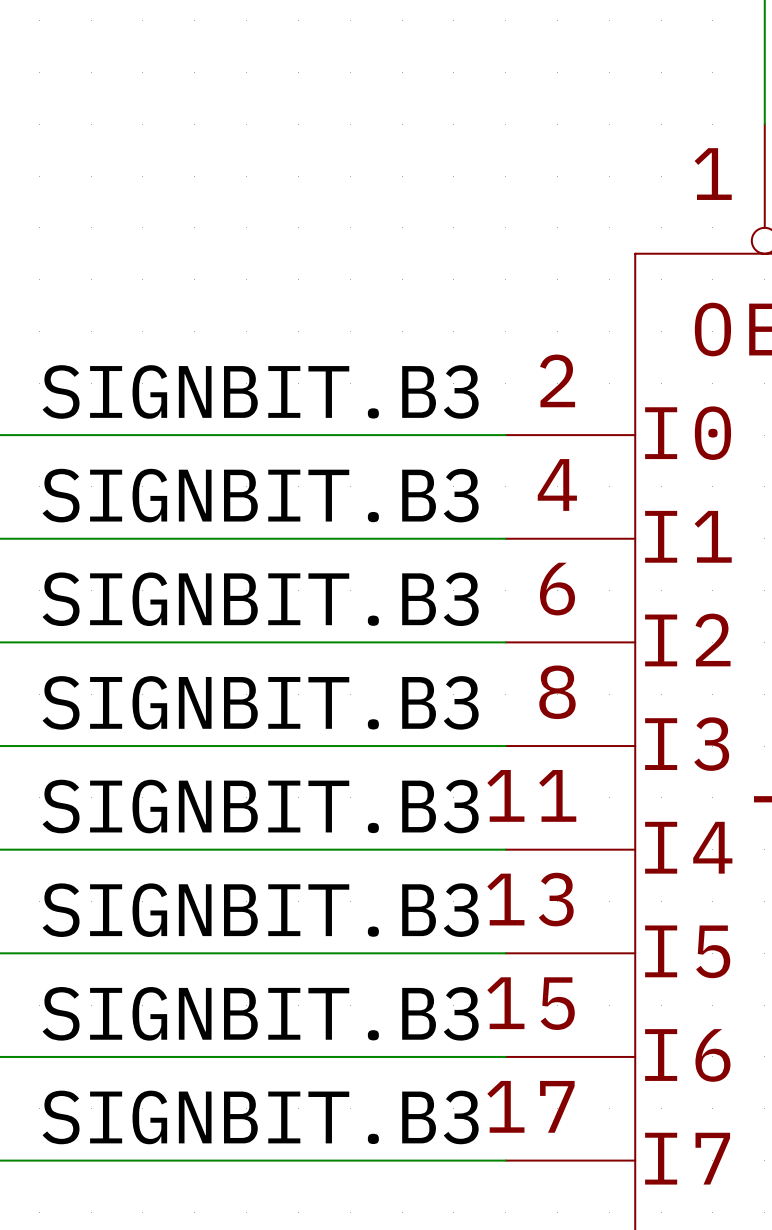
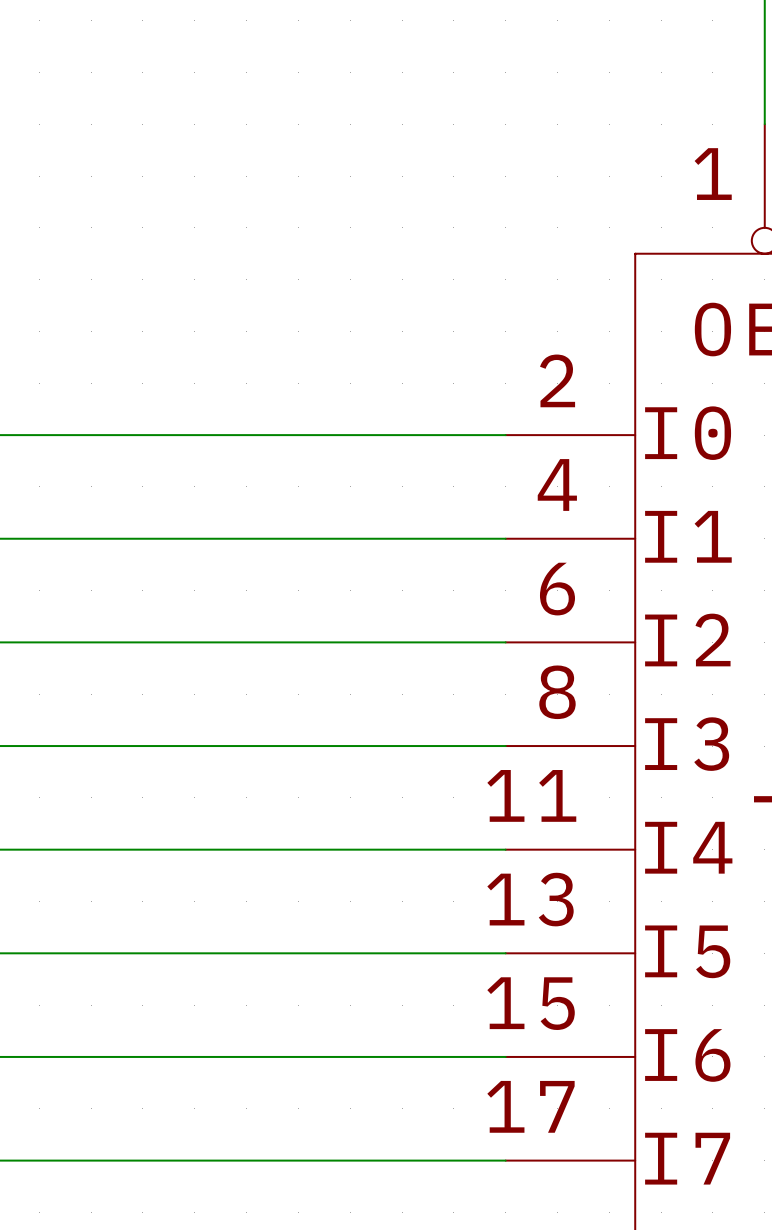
label: SIGNBIT.B3 (260, 391) -> none
label: SIGNBIT.B3 (260, 495) -> none
label: SIGNBIT.B3 (260, 599) -> none
label: SIGNBIT.B3 (260, 702) -> none
label: SIGNBIT.B3 (260, 806) -> none
label: SIGNBIT.B3 (260, 910) -> none
label: SIGNBIT.B3 (260, 1013) -> none
label: SIGNBIT.B3 (260, 1117) -> none

